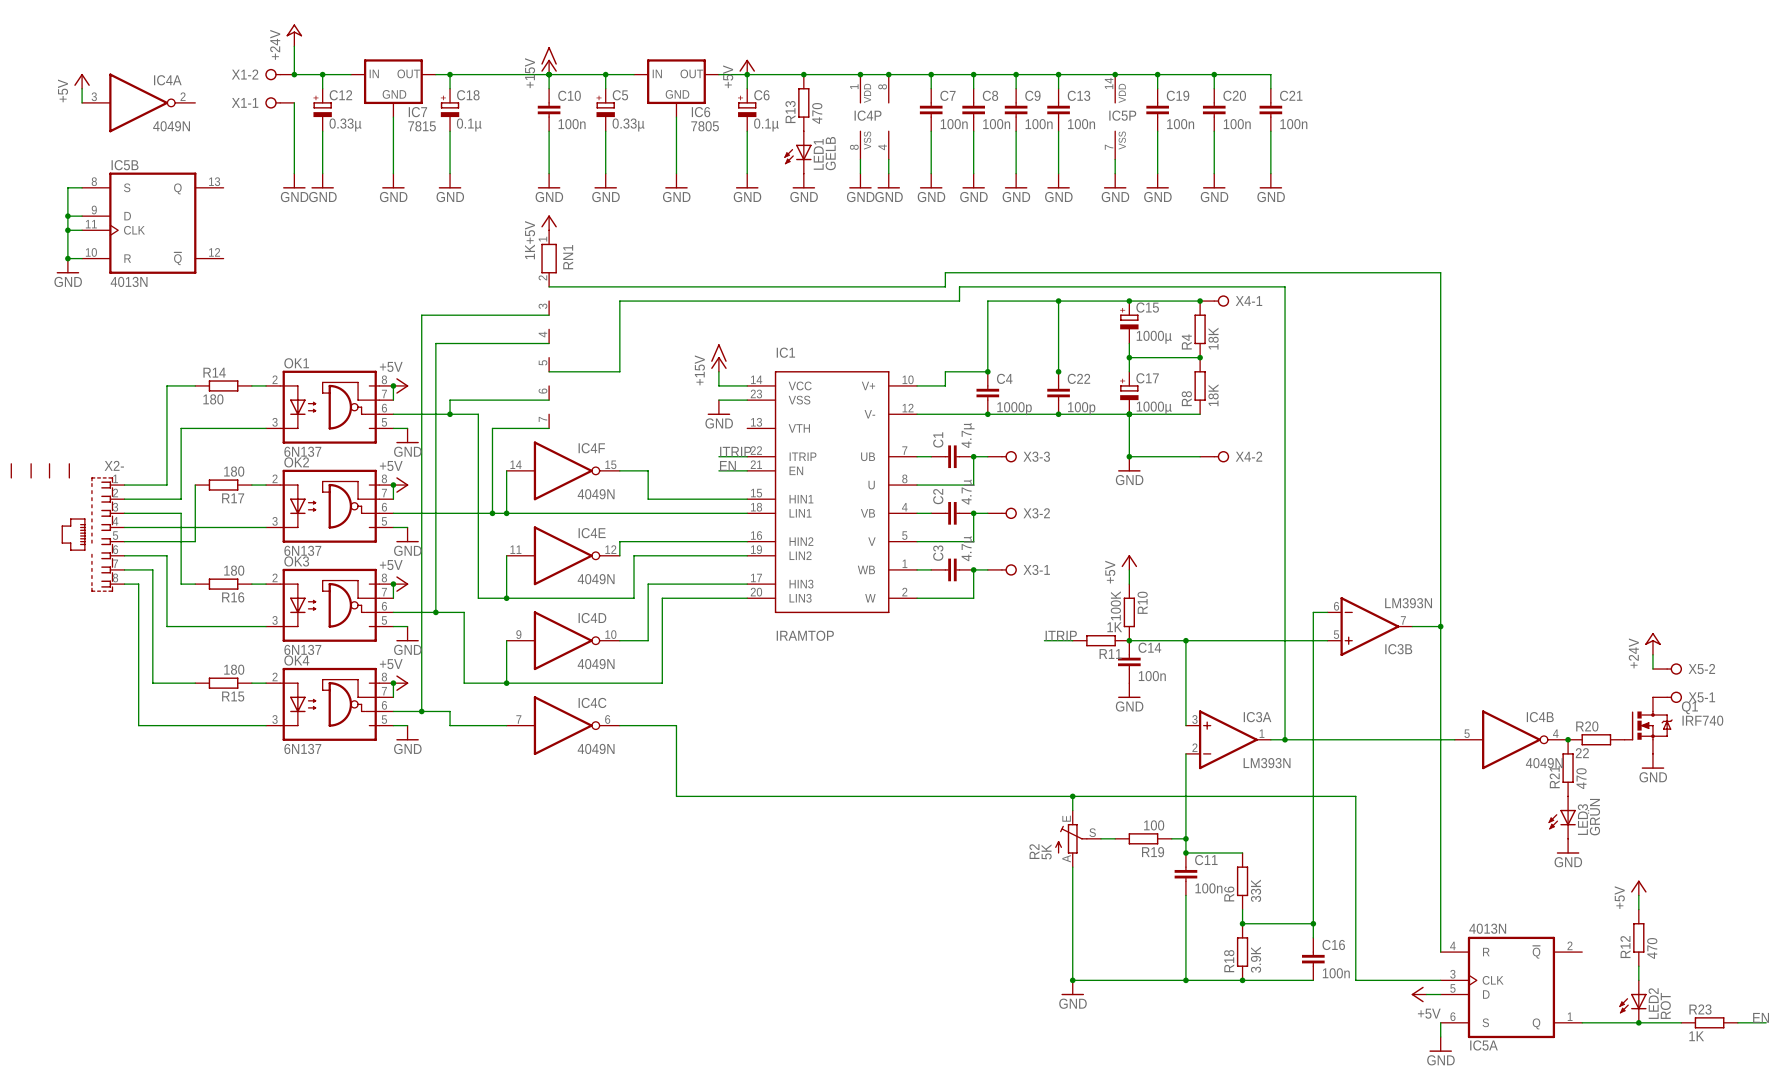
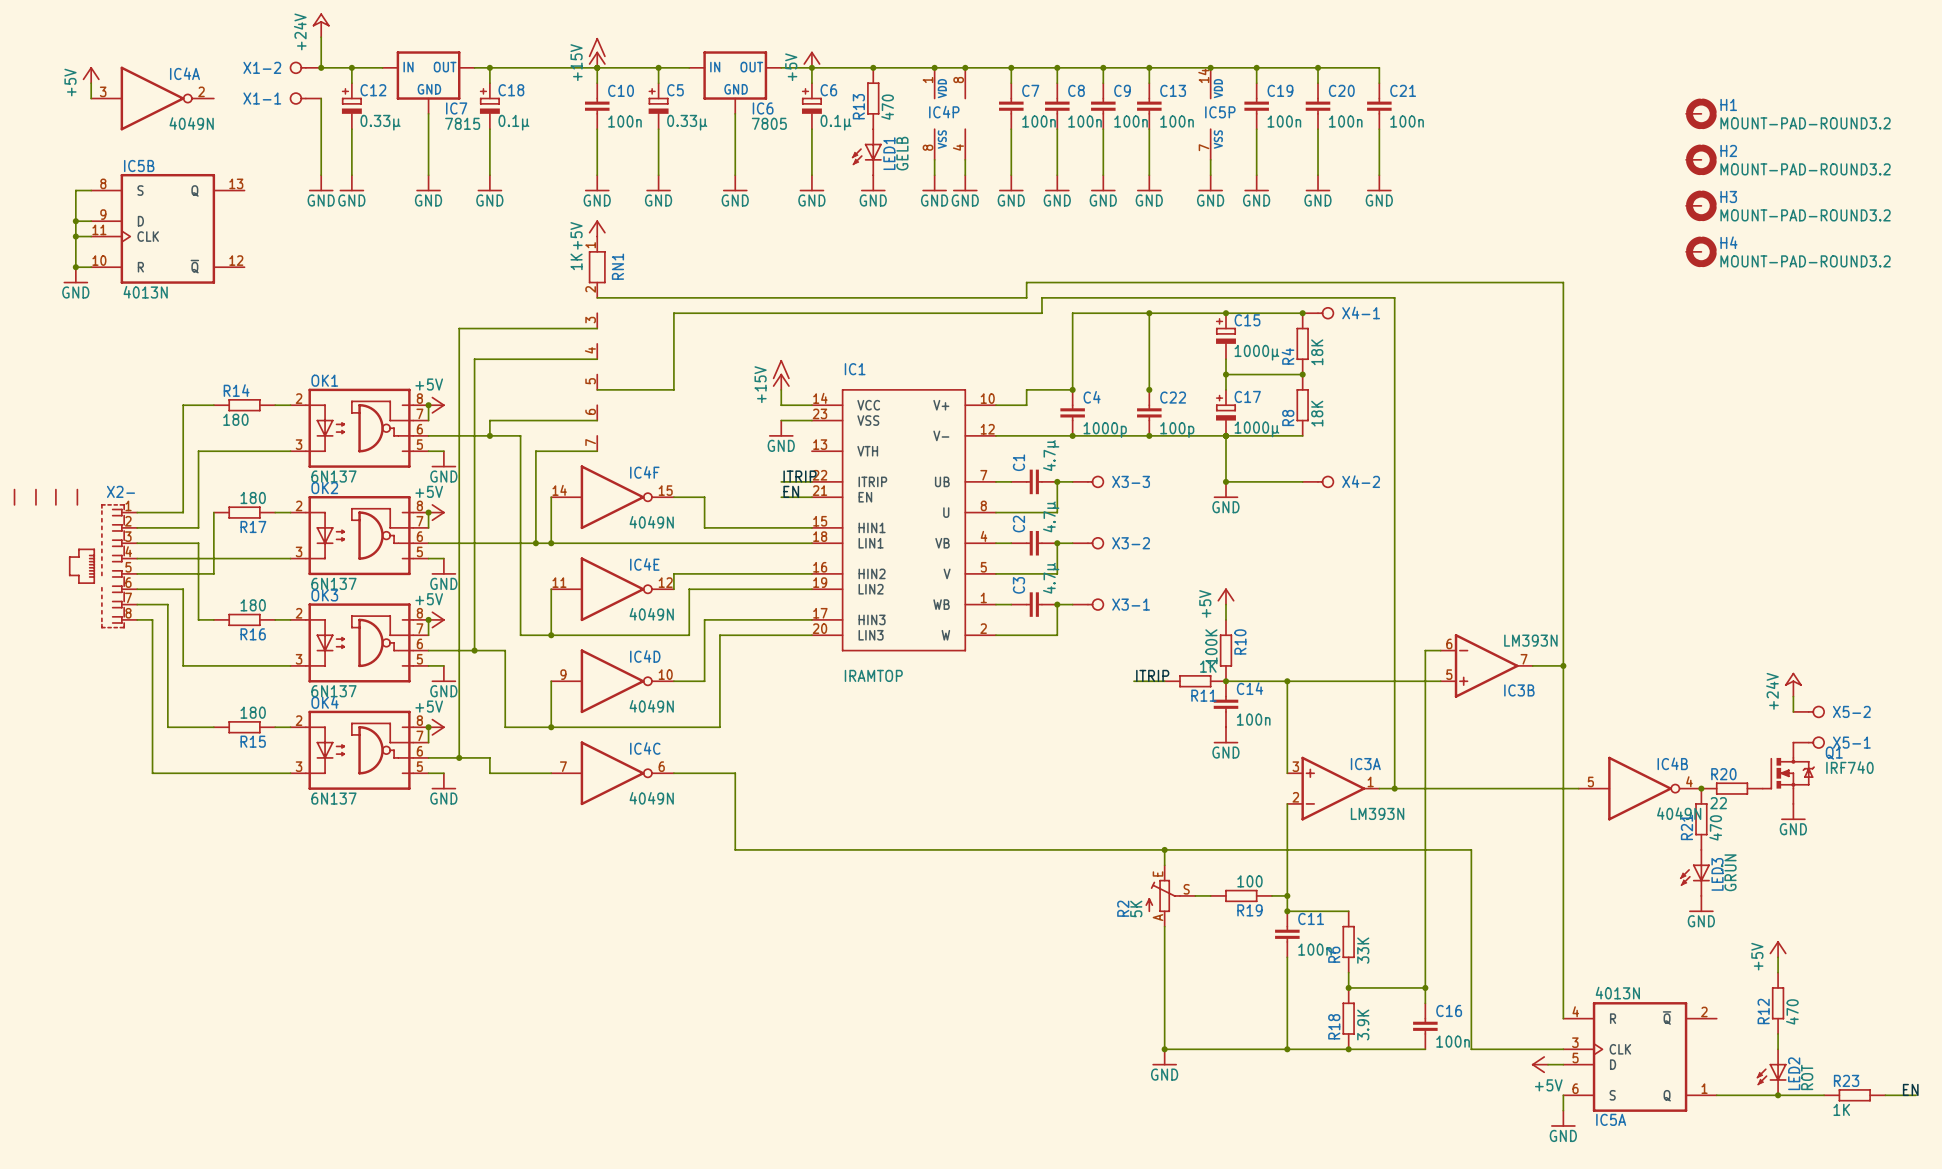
H1: none -> MOUNT-PAD-ROUND3.2 (1701, 113)
H2: none -> MOUNT-PAD-ROUND3.2 (1701, 159)
H3: none -> MOUNT-PAD-ROUND3.2 (1701, 205)
H4: none -> MOUNT-PAD-ROUND3.2 (1701, 251)

